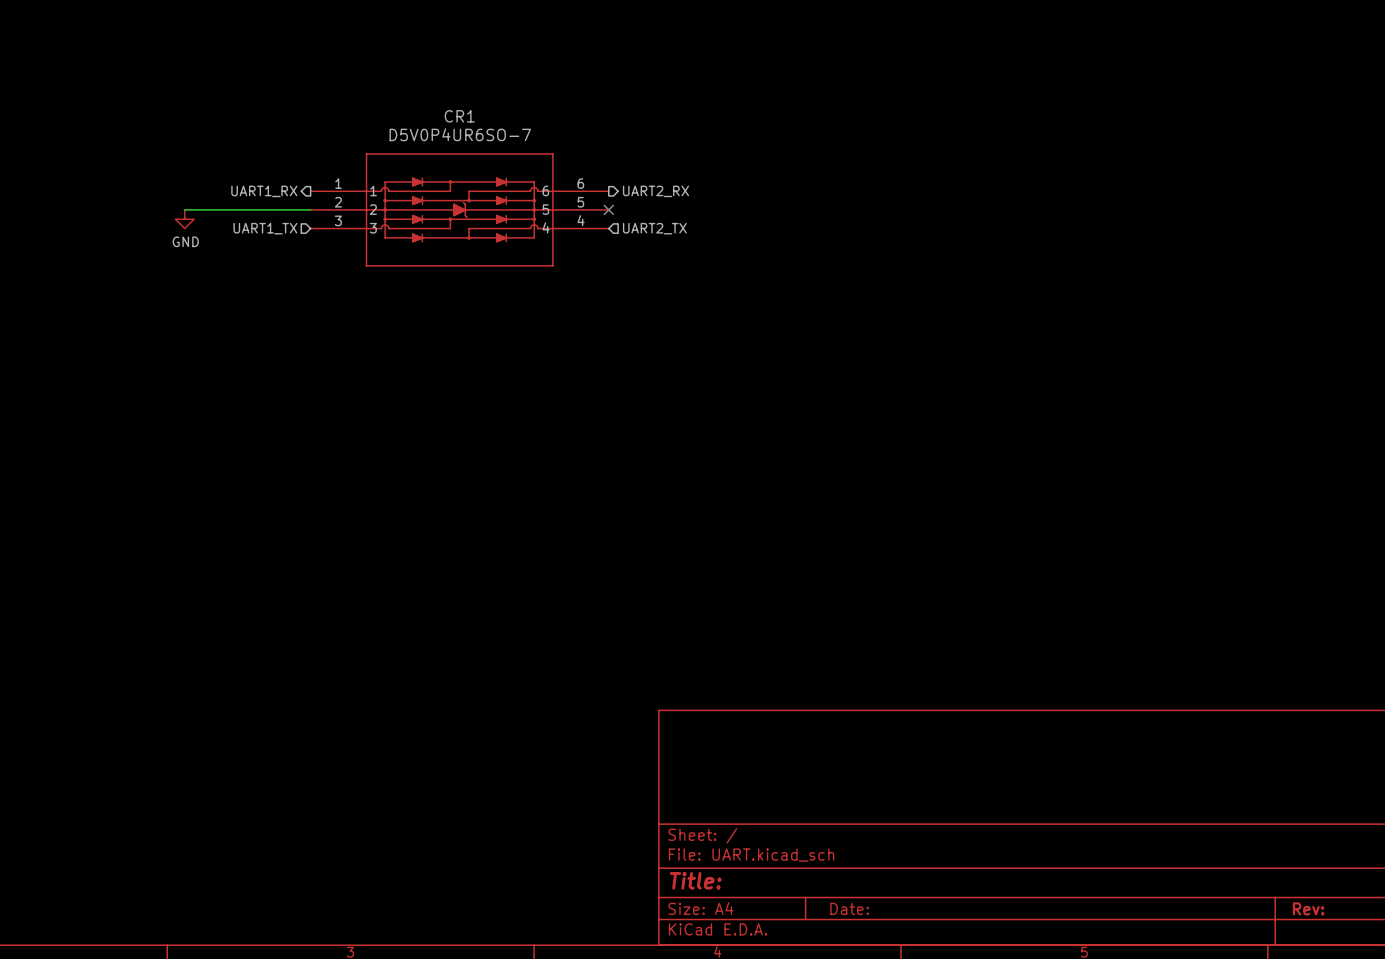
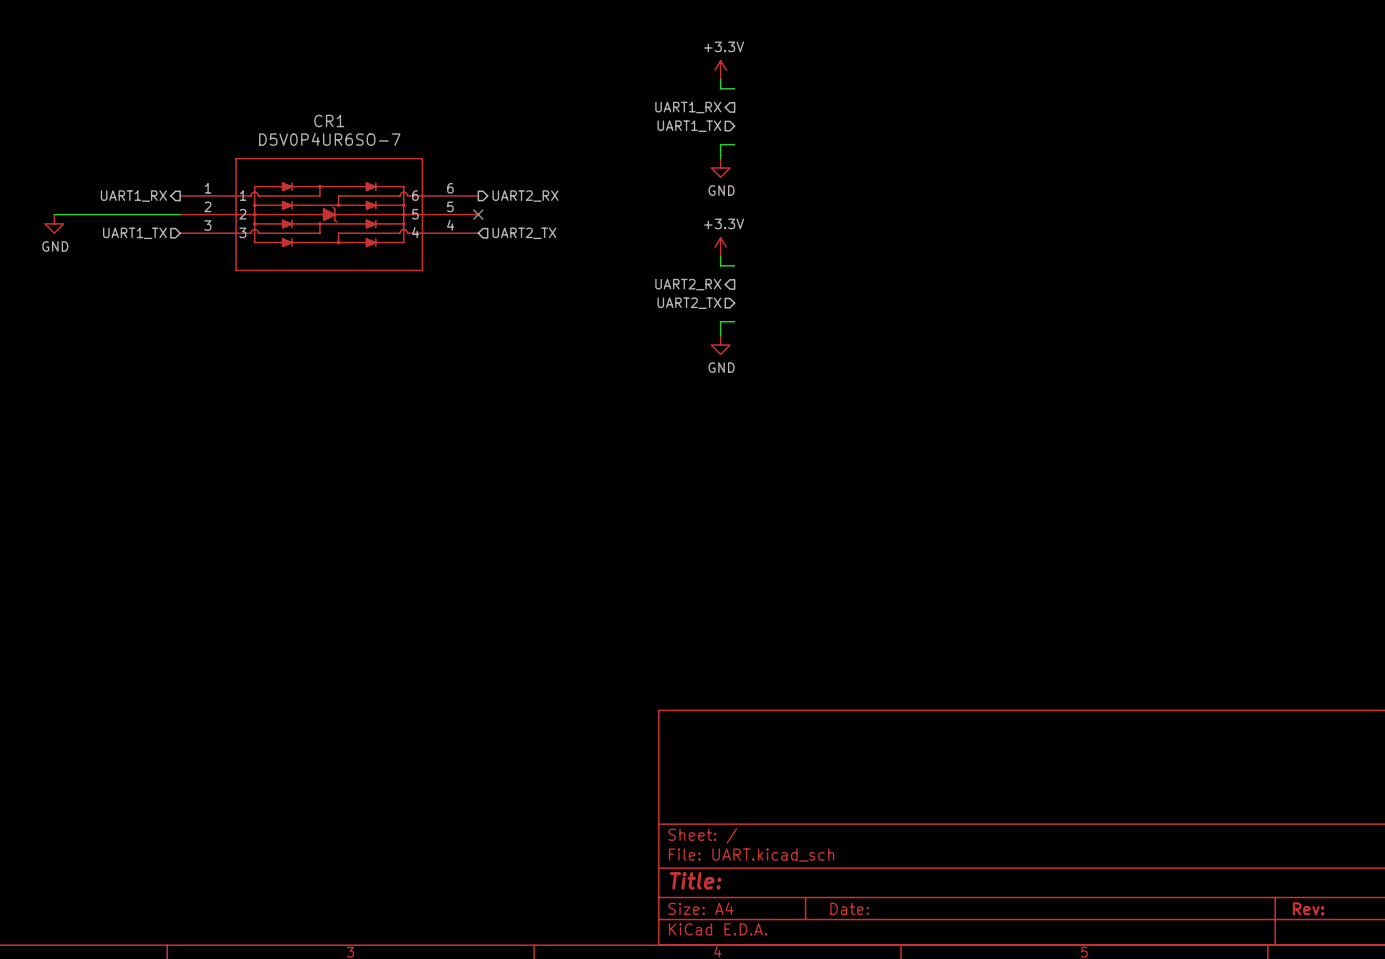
power symbol: none -> +3.3V (720, 70)
wire: none -> (720, 79) (720, 88) (734, 88)
hierarchical label: none -> UART1_RX (688, 107)
hierarchical label: none -> UART1_TX (689, 126)
wire: none -> (734, 144) (720, 144) (720, 158)
power symbol: none -> GND (720, 167)
hierarchical label position: UART1_RX (264, 191) -> UART1_RX (133, 196)
hierarchical label: UART2_RX (655, 191) -> none
hierarchical label: none -> UART2_RX (525, 196)
wire: (184, 209) (310, 209) -> (54, 214) (180, 214)
CR1 position: (459, 209) -> (329, 214)
no-connect mark: (608, 209) -> none
no-connect mark: none -> (478, 214)
power symbol position: GND (184, 219) -> GND (54, 223)
hierarchical label position: UART1_TX (265, 228) -> UART1_TX (134, 233)
hierarchical label: UART2_TX (654, 228) -> none
hierarchical label: none -> UART2_TX (524, 233)
power symbol: none -> +3.3V (720, 247)
wire: none -> (720, 256) (720, 265) (734, 265)
hierarchical label: none -> UART2_RX (688, 284)
hierarchical label: none -> UART2_TX (689, 303)
wire: none -> (734, 321) (720, 321) (720, 335)
power symbol: none -> GND (720, 345)

